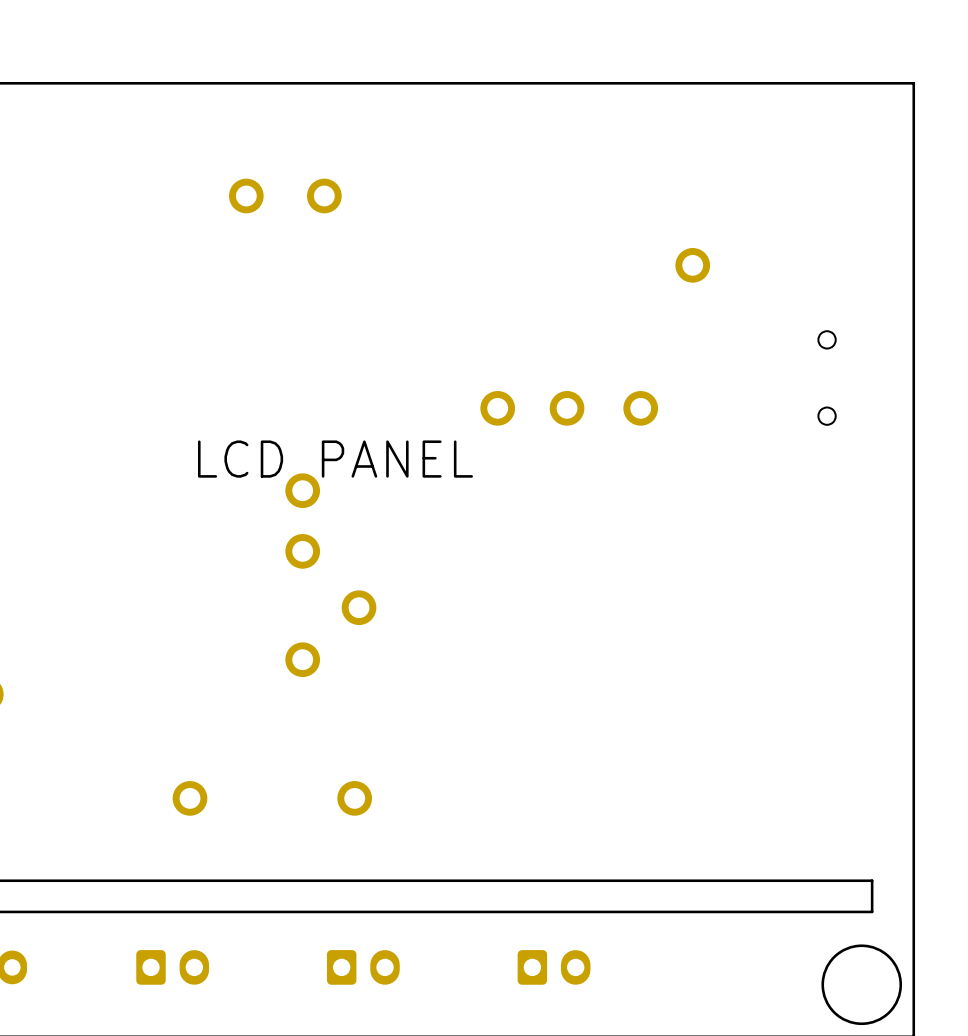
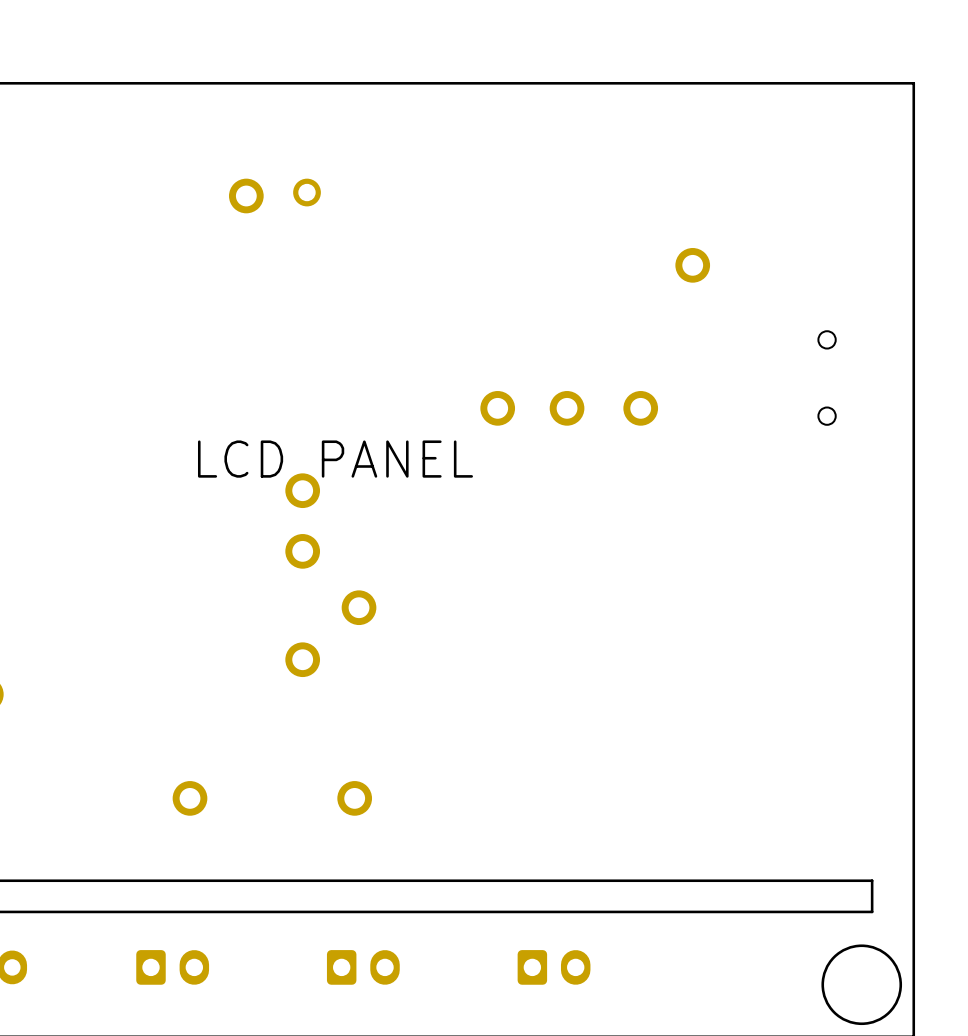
part: none -> (307, 192)
part: (324, 195) -> none

